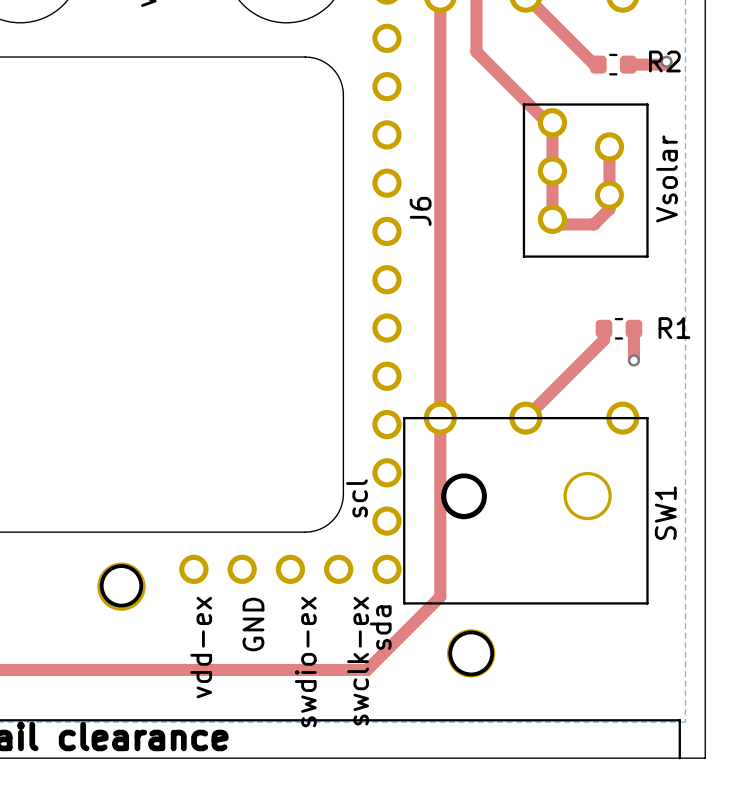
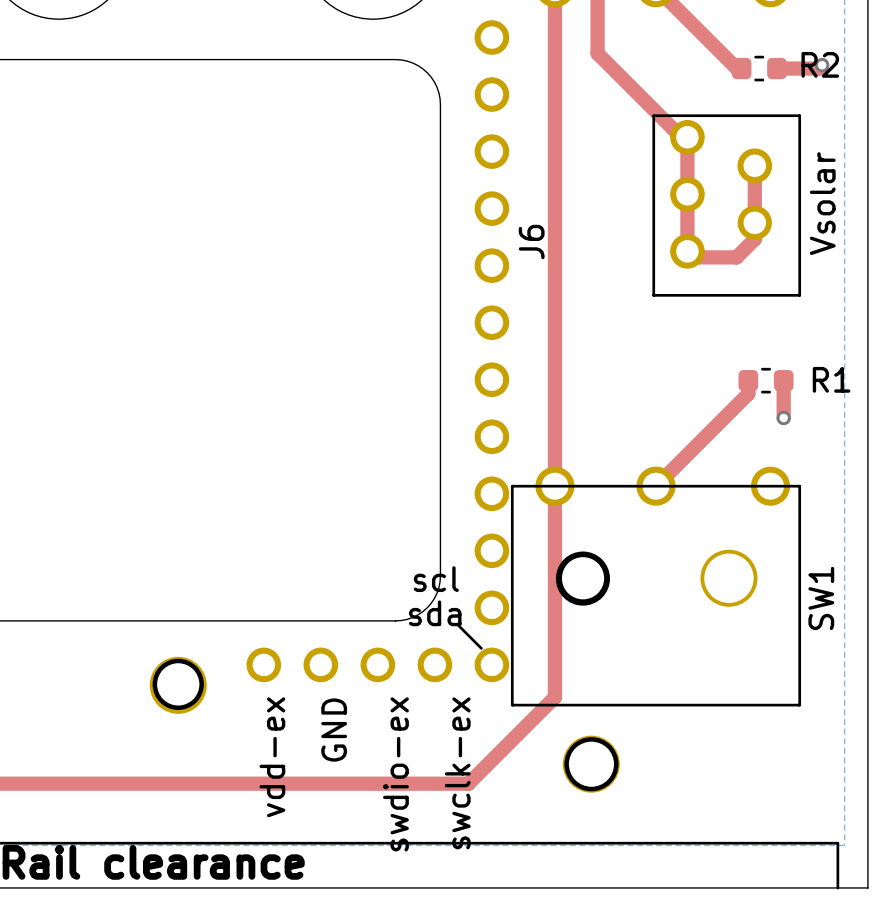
text rotation: 0° (356, 498) -> 90° clockwise (436, 579)
line: none -> (458, 625) (481, 648)
text rotation: 0° (380, 627) -> 90° clockwise (435, 613)
text position: sda (380, 627) -> sda (435, 613)

